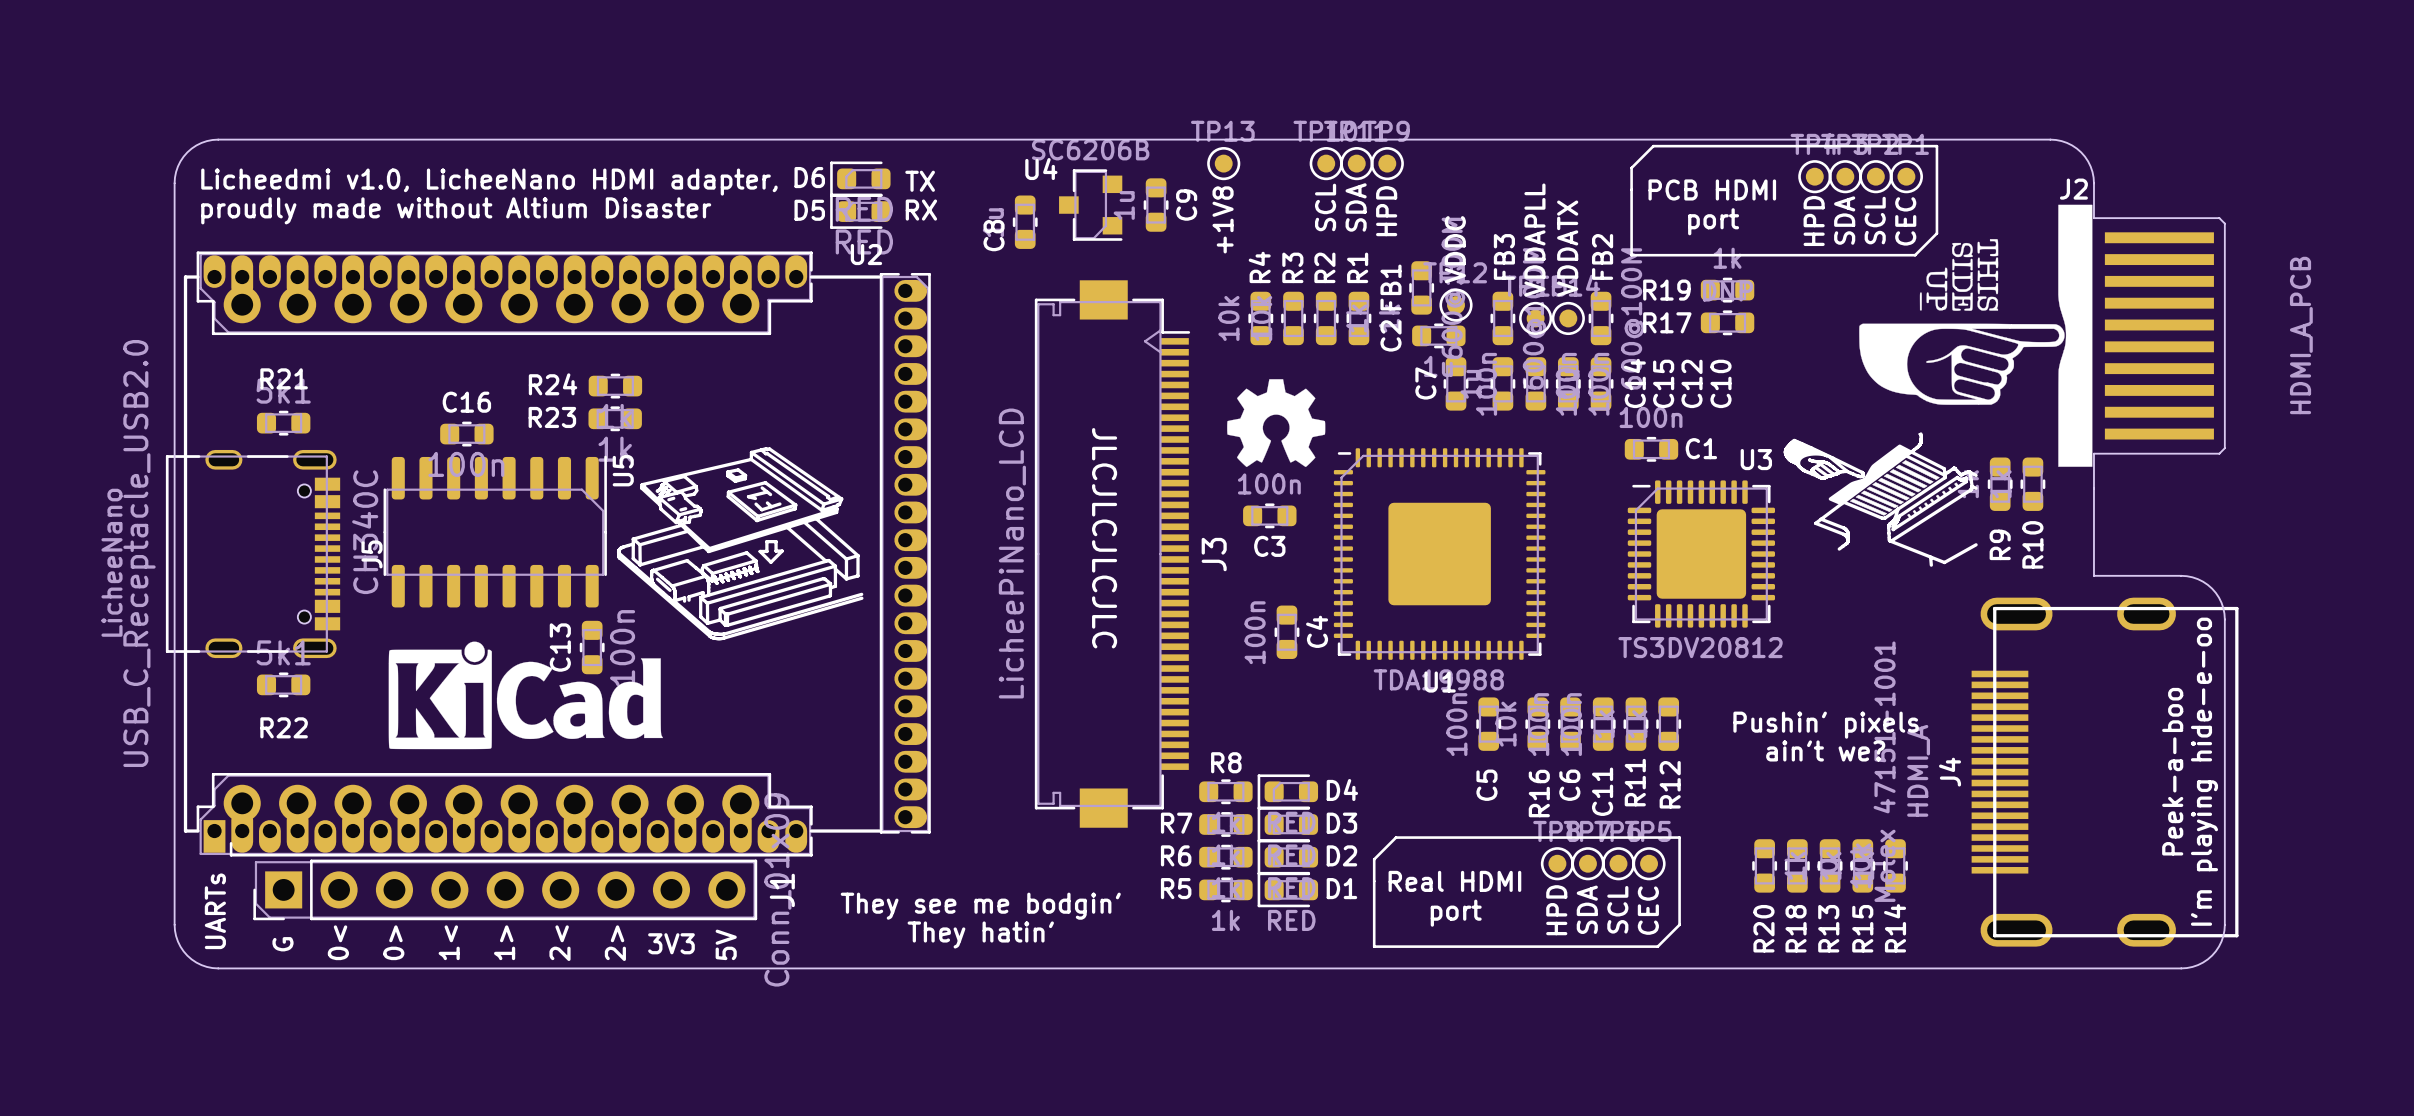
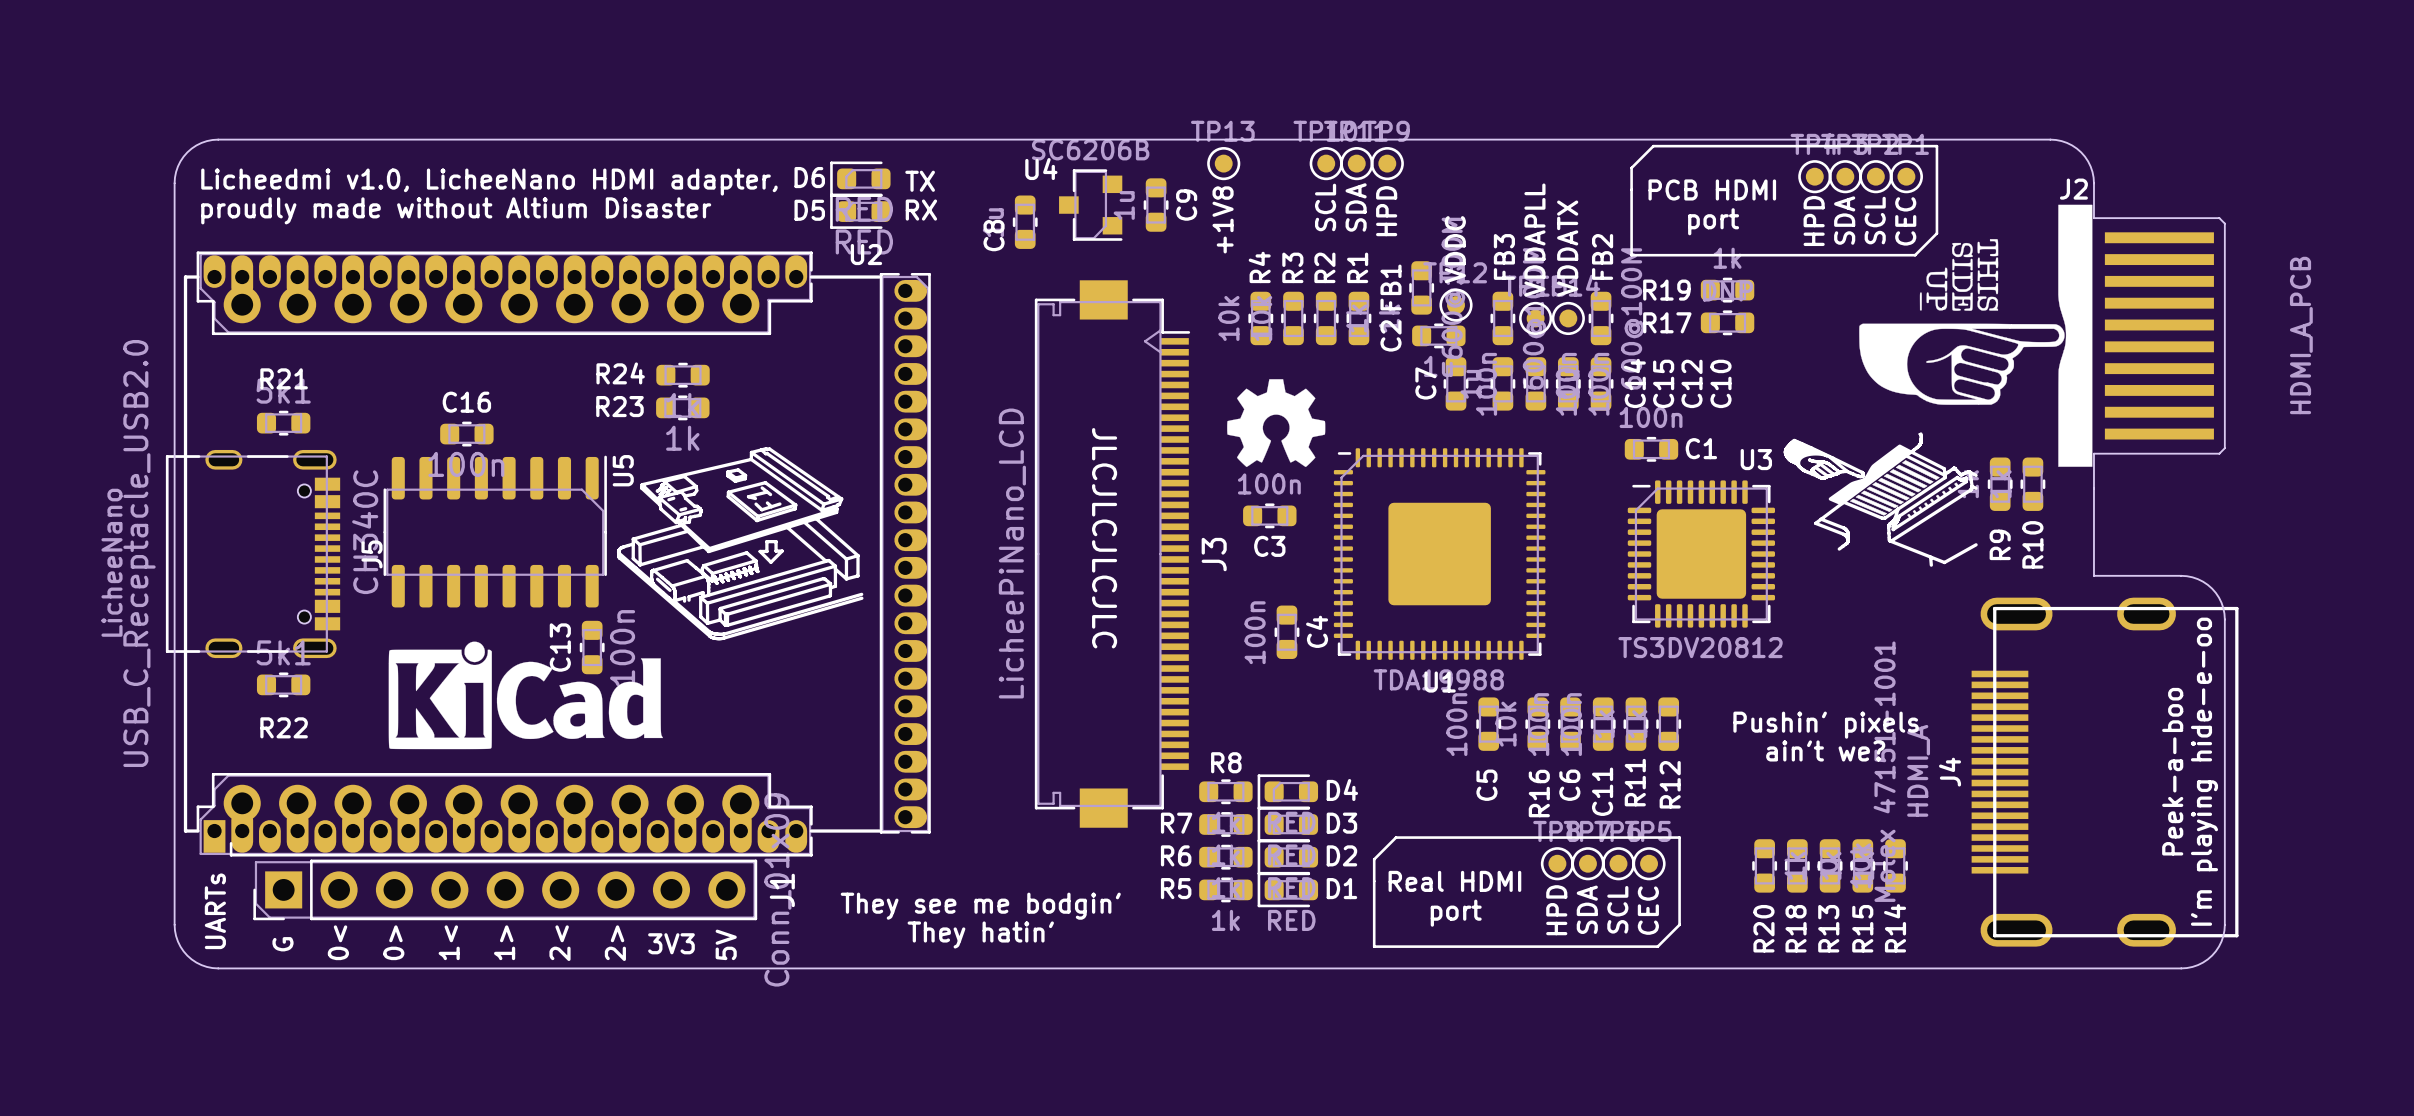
R24 position: (615, 386) -> (683, 375)
R23 position: (615, 418) -> (682, 407)

